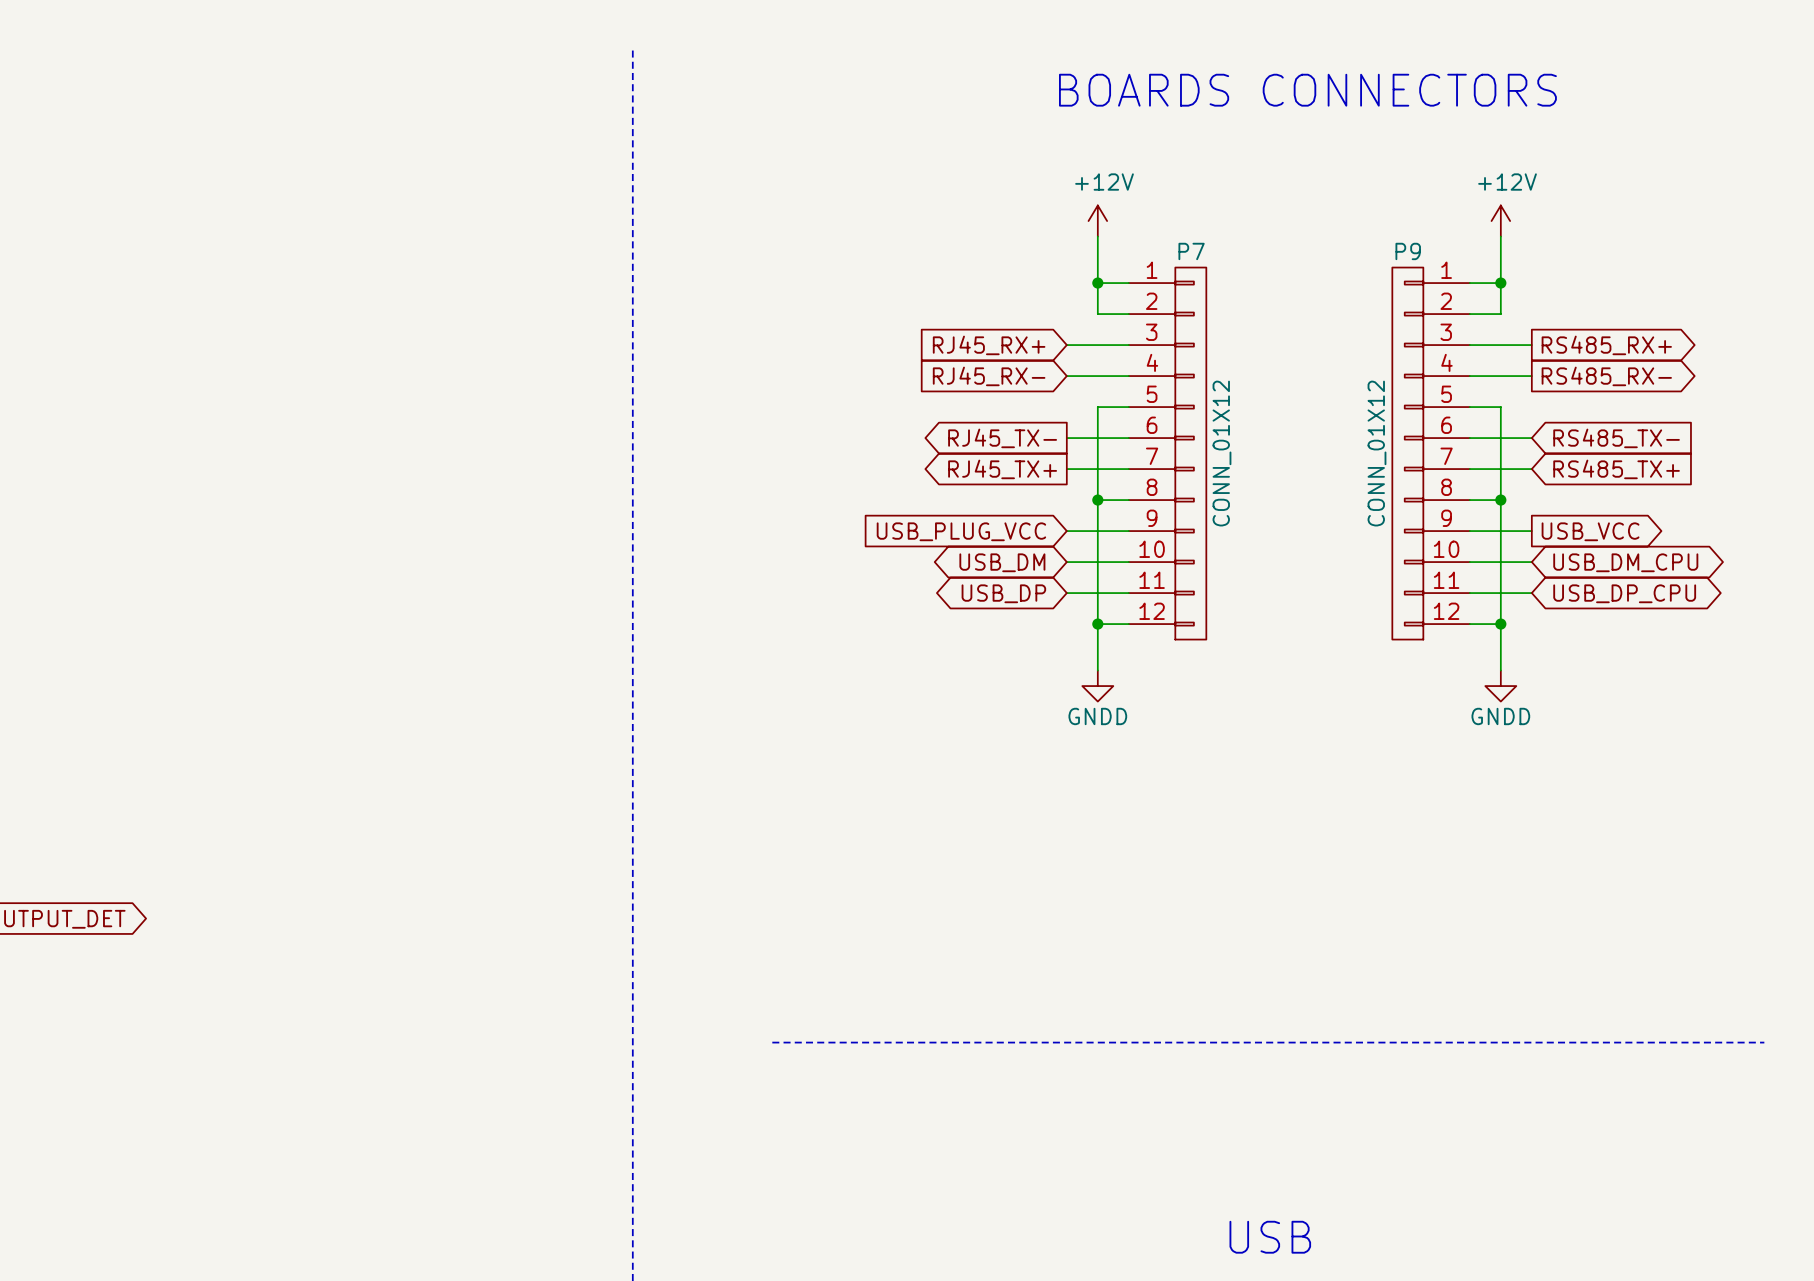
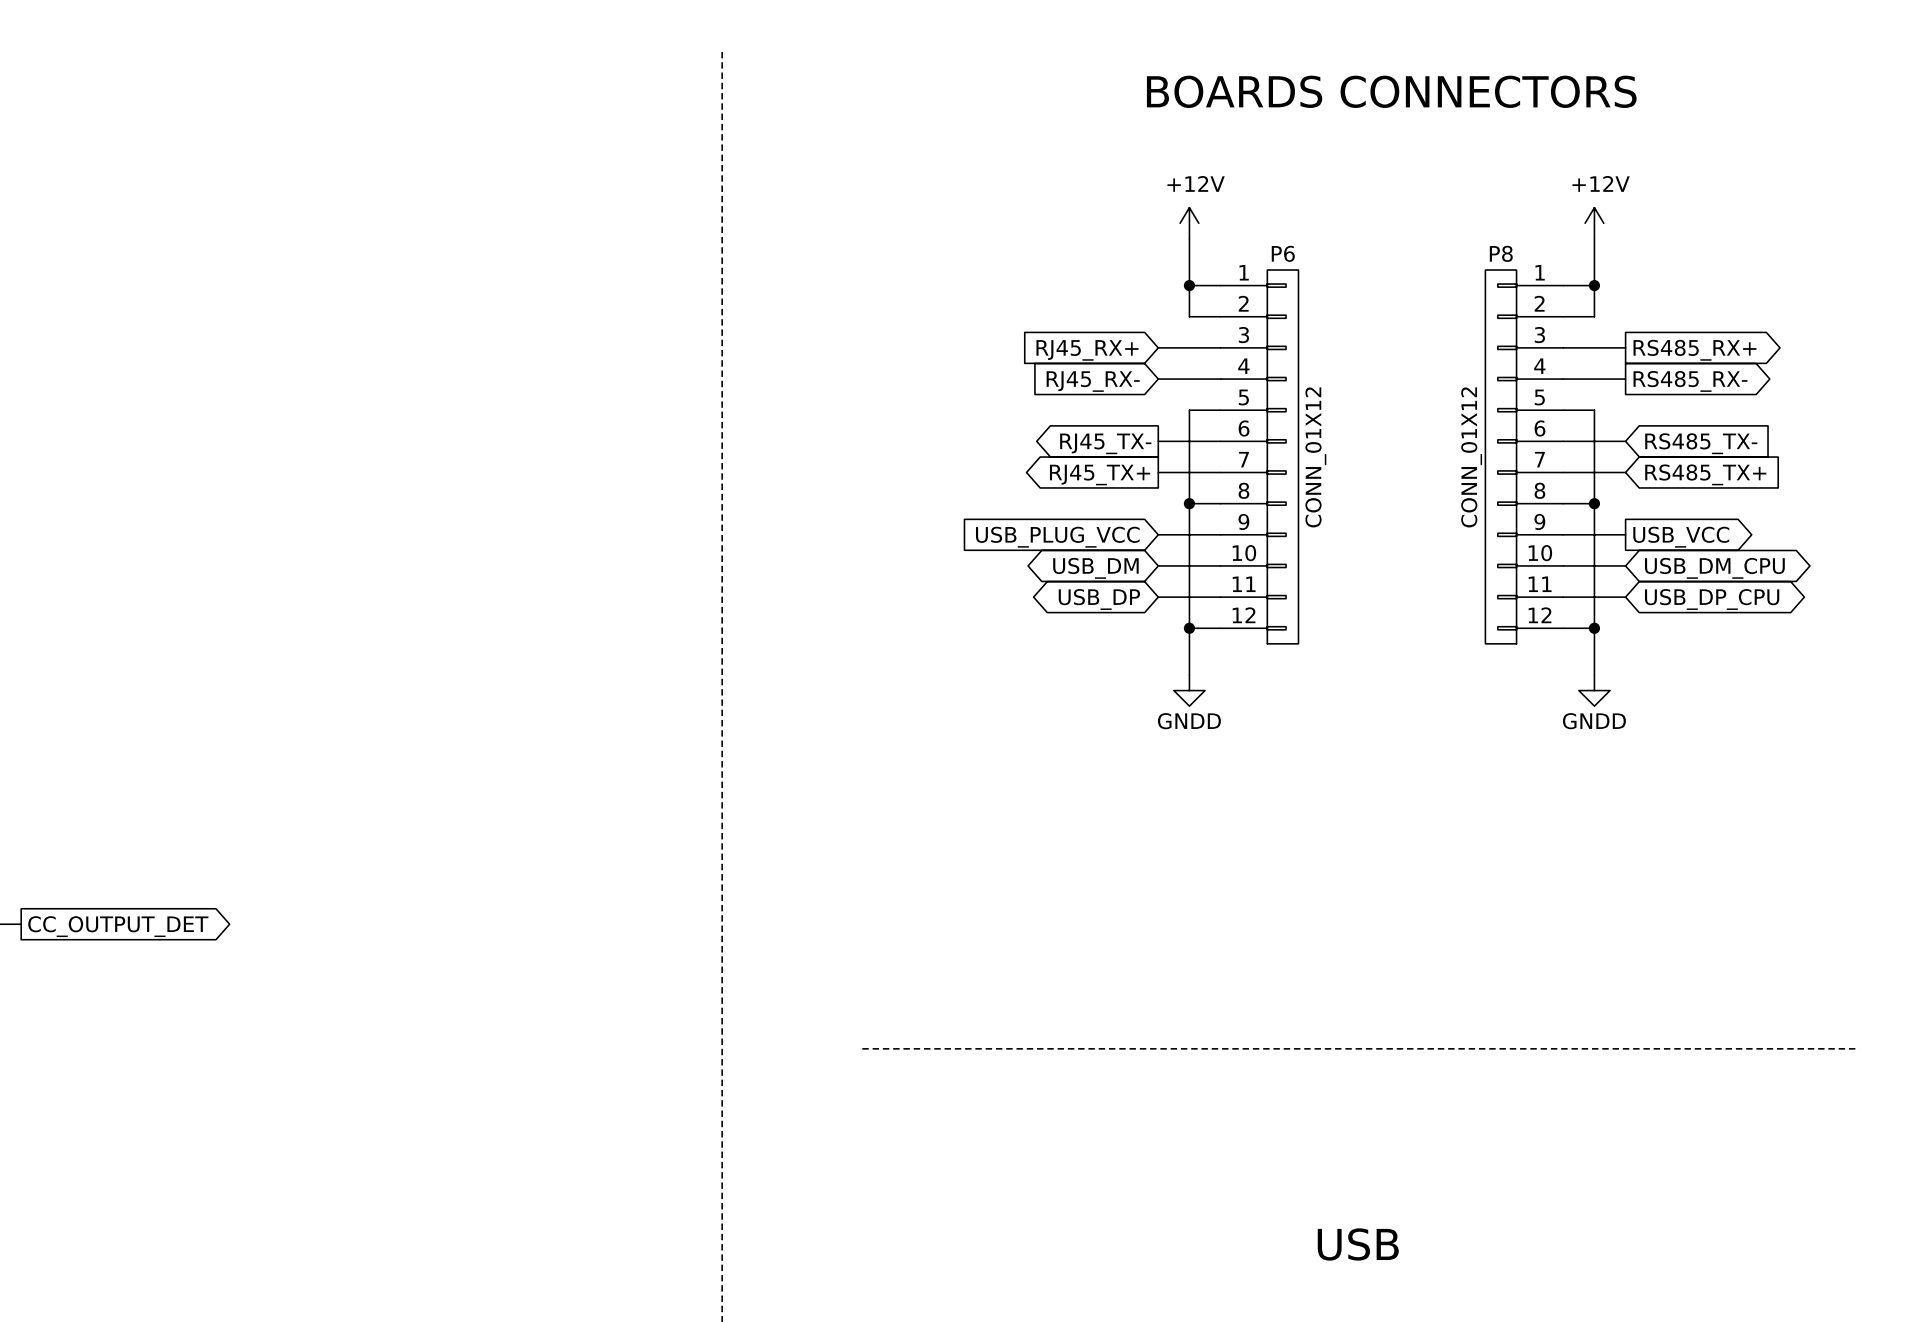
P7 name: P7 (1191, 251) -> P6 (1283, 253)
P9 name: P9 (1408, 251) -> P8 (1501, 253)

